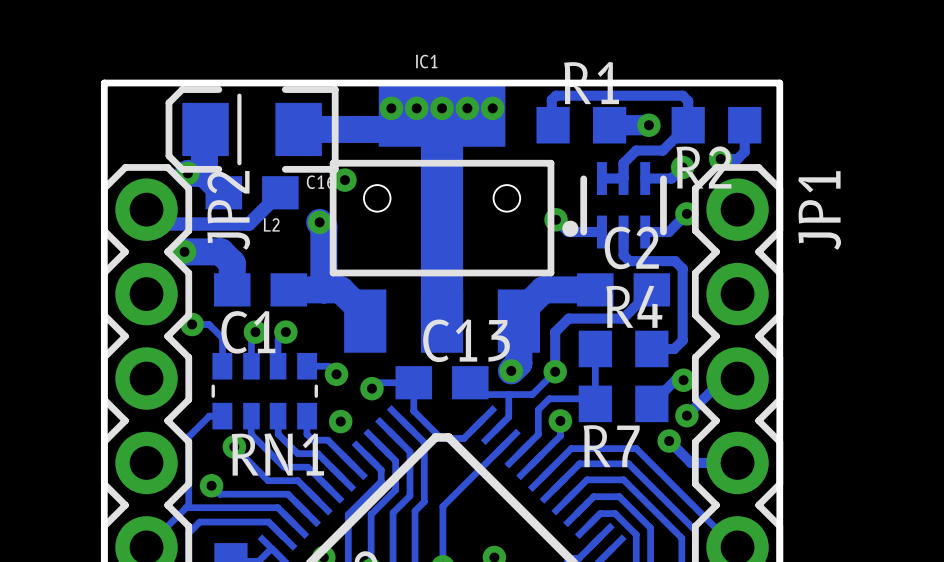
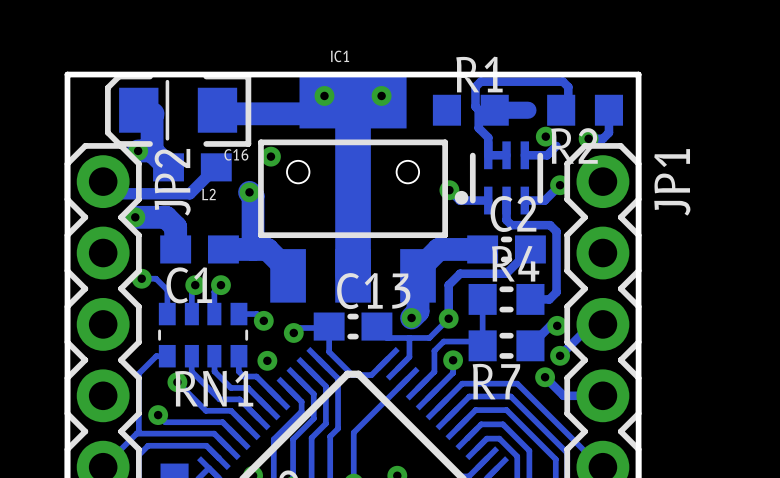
via: (391, 108) -> none
via: none -> (324, 95)
via: (416, 108) -> none
via: (442, 108) -> none
via: (467, 108) -> none
via: none -> (381, 95)
via: (492, 108) -> none
track: none -> (568, 106) (568, 87) (562, 81) (480, 81) (475, 87) (475, 106) (478, 109) (478, 128) (488, 137) (488, 155)
track: (553, 125) (551, 99) (556, 95) (682, 95) (688, 101) (688, 125) (662, 150) (636, 150) (623, 163) (623, 178) -> none
via: (648, 125) -> none
C16 position: (252, 129) -> (178, 110)
via position: (682, 167) -> (545, 136)
C2 footprint: [577, 273, 671, 307] -> [467, 235, 546, 264]
R4 footprint: [578, 330, 669, 368] -> [468, 283, 545, 315]
C13 footprint: [395, 366, 489, 400] -> [313, 312, 393, 341]
R7 footprint: [578, 385, 669, 423] -> [468, 330, 545, 362]

